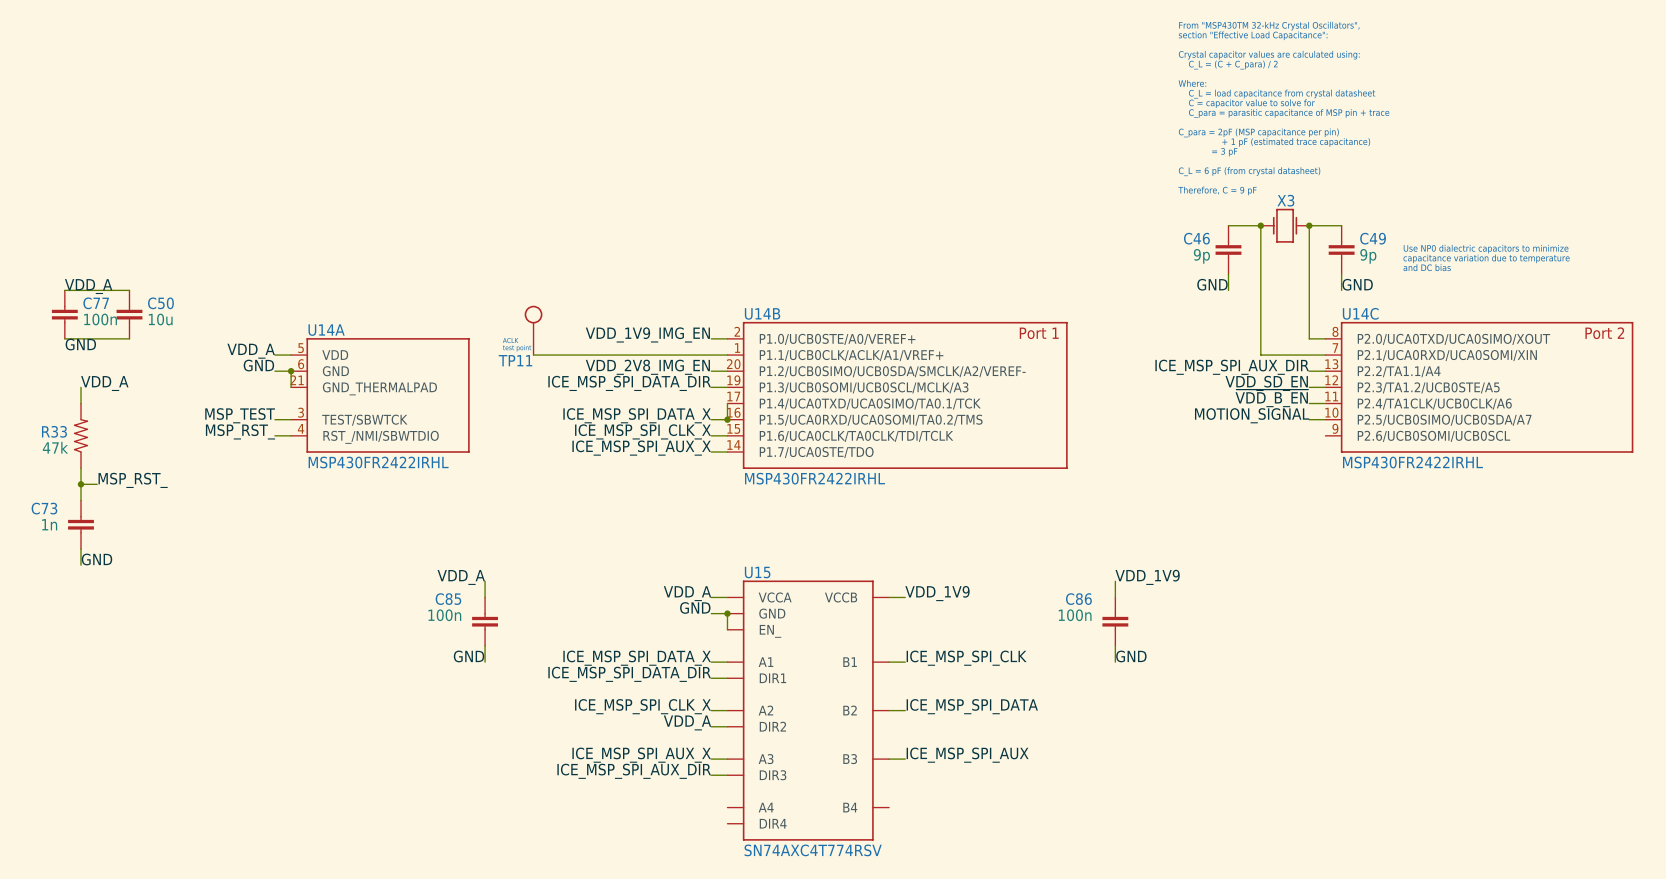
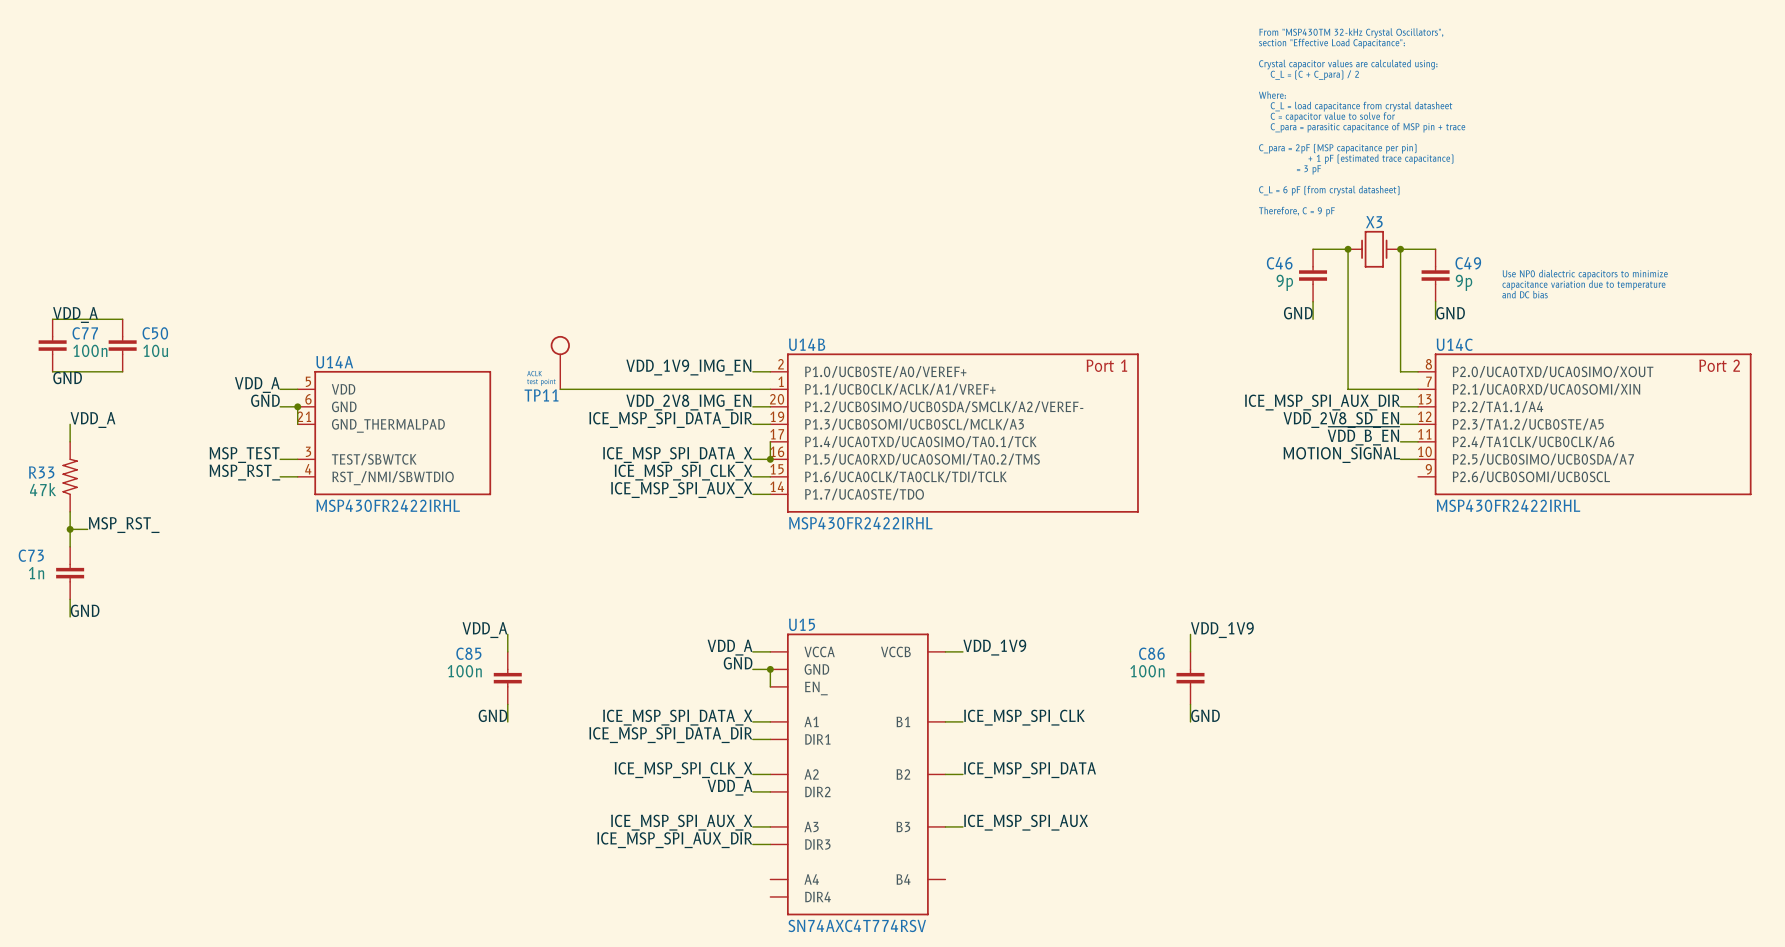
label: VDD_SD_EN (1266, 383) -> VDD_2V8_SD_EN (1341, 420)

